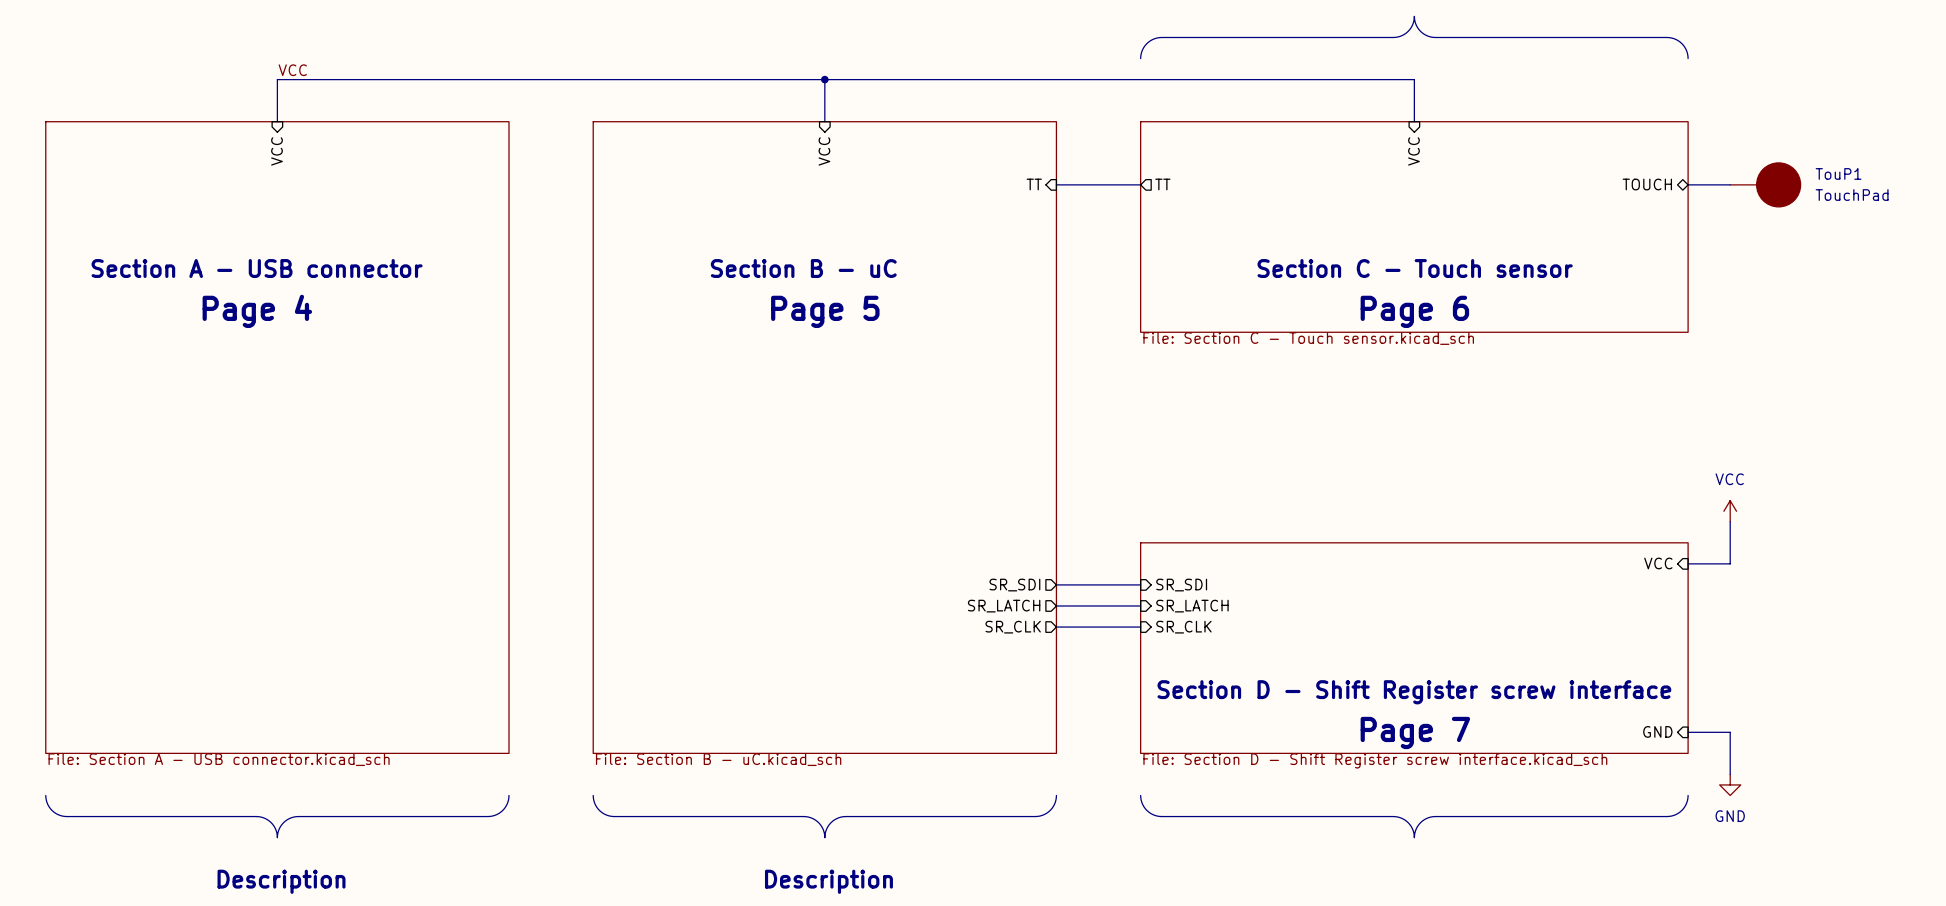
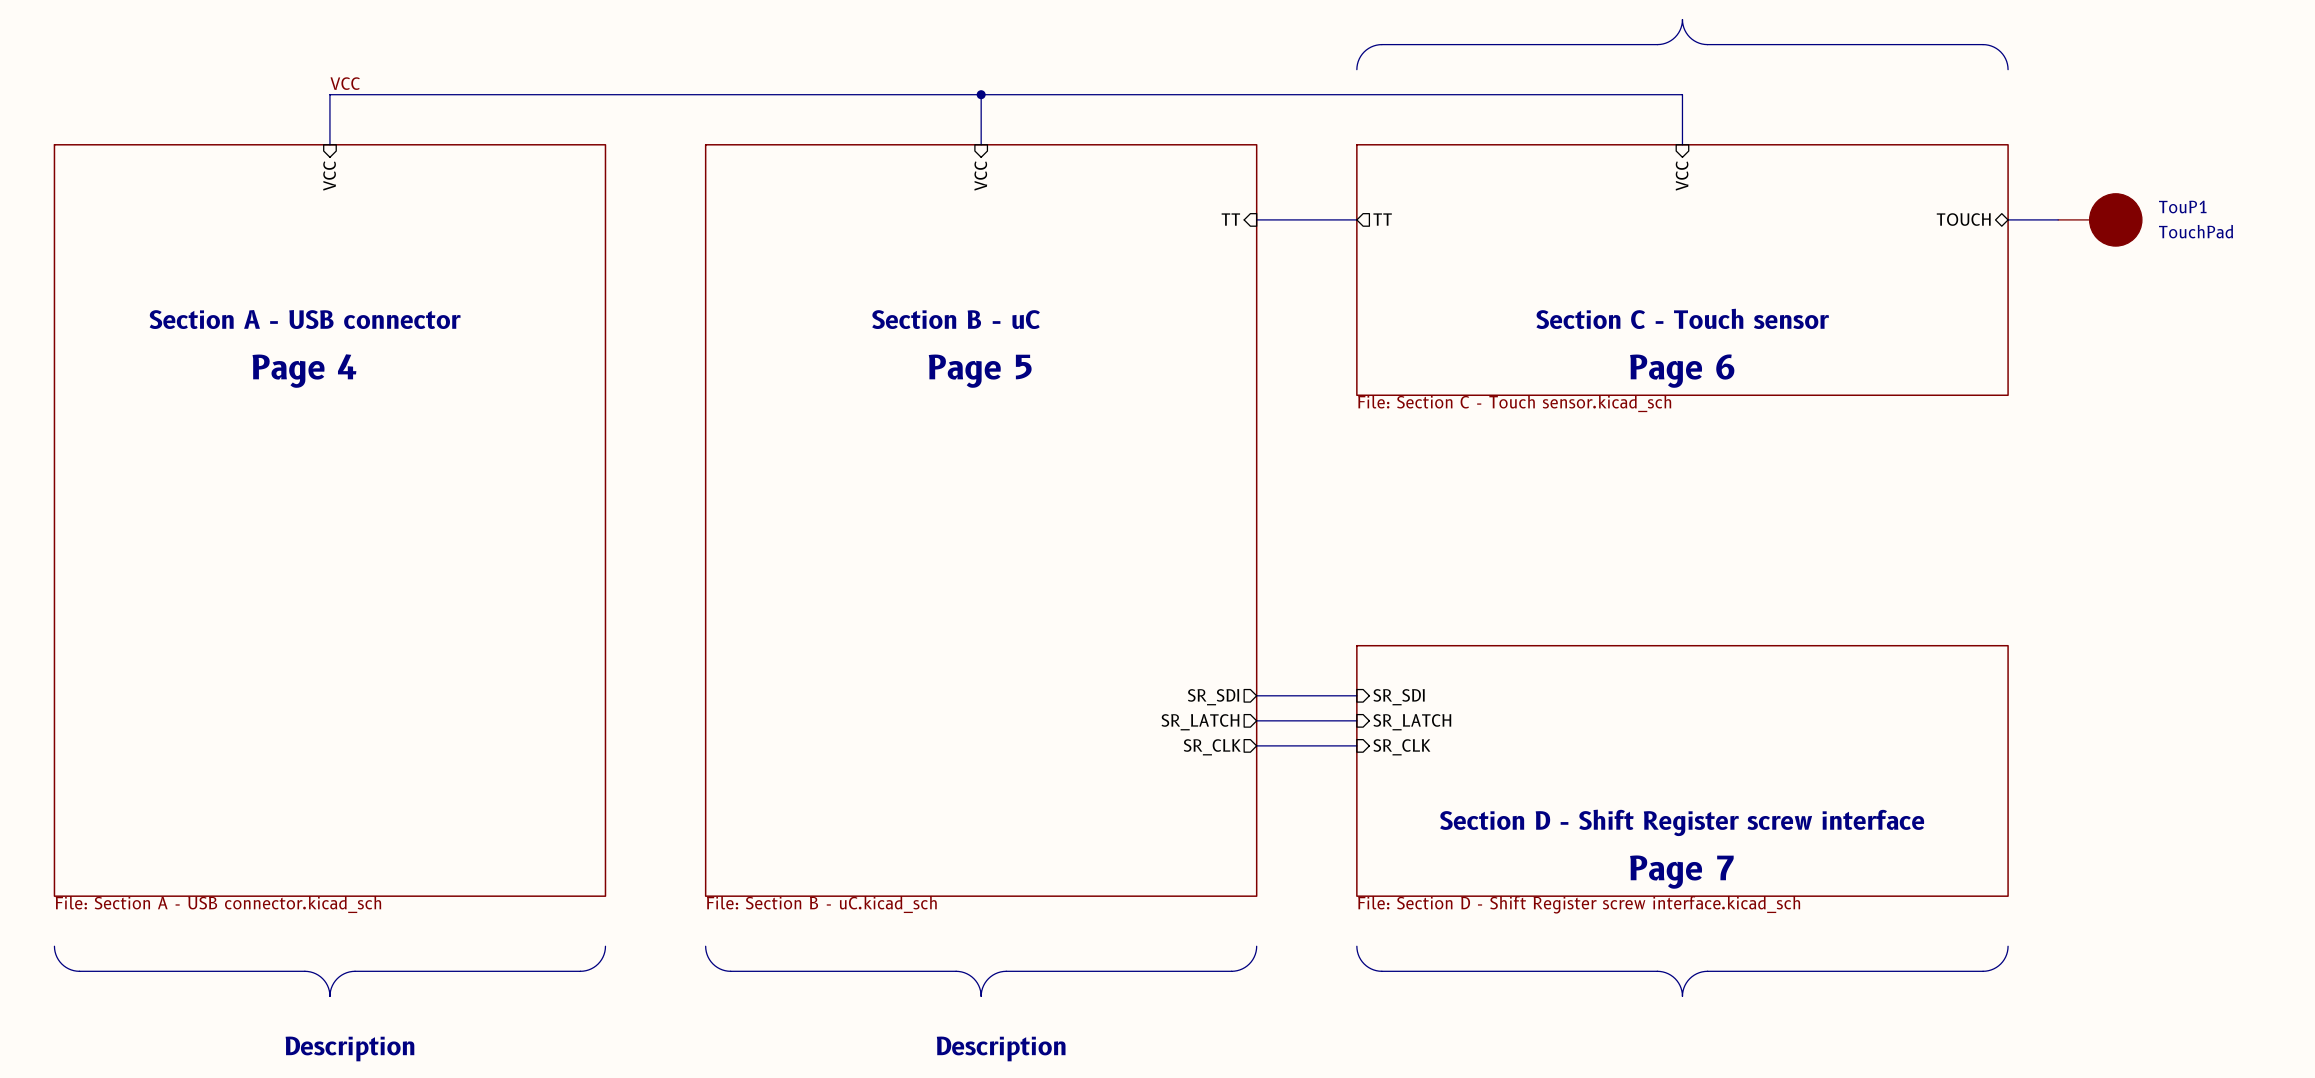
power symbol: VCC (1730, 511) -> none
wire: (1730, 521) (1730, 563) (1688, 563) -> none
sheet pin: VCC (1658, 563) -> none
sheet pin: GND (1657, 731) -> none
wire: (1688, 732) (1730, 732) (1730, 774) -> none
power symbol: GND (1730, 784) -> none

